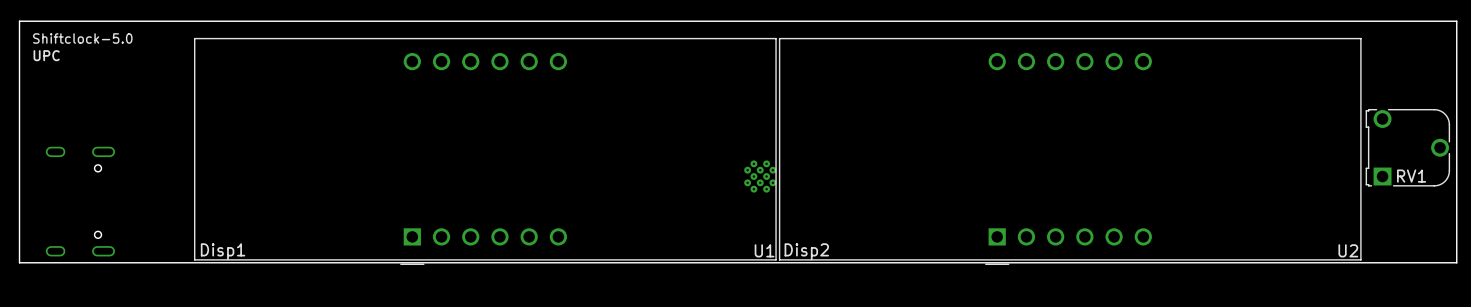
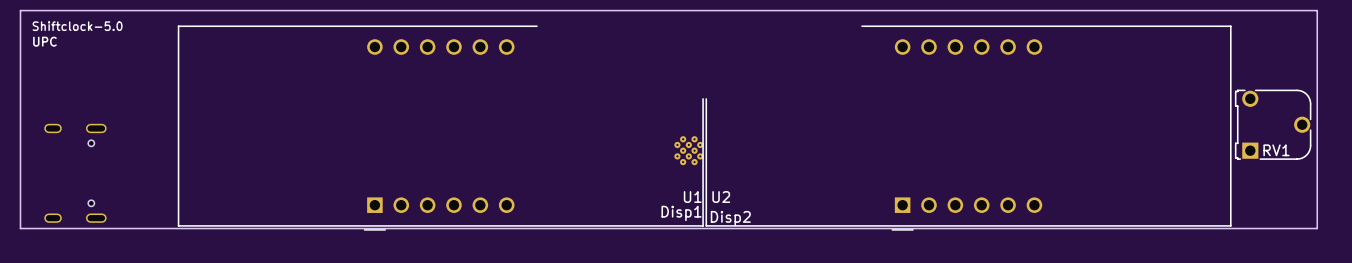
U1 footprint: [194, 37, 777, 265] -> [177, 25, 704, 231]
U2 footprint: [778, 37, 1362, 265] -> [705, 25, 1232, 231]
text: none -> Disp1 (681, 213)
U2 name position: U2 (1348, 250) -> U2 (721, 197)
text: Disp1 (223, 251) -> none

